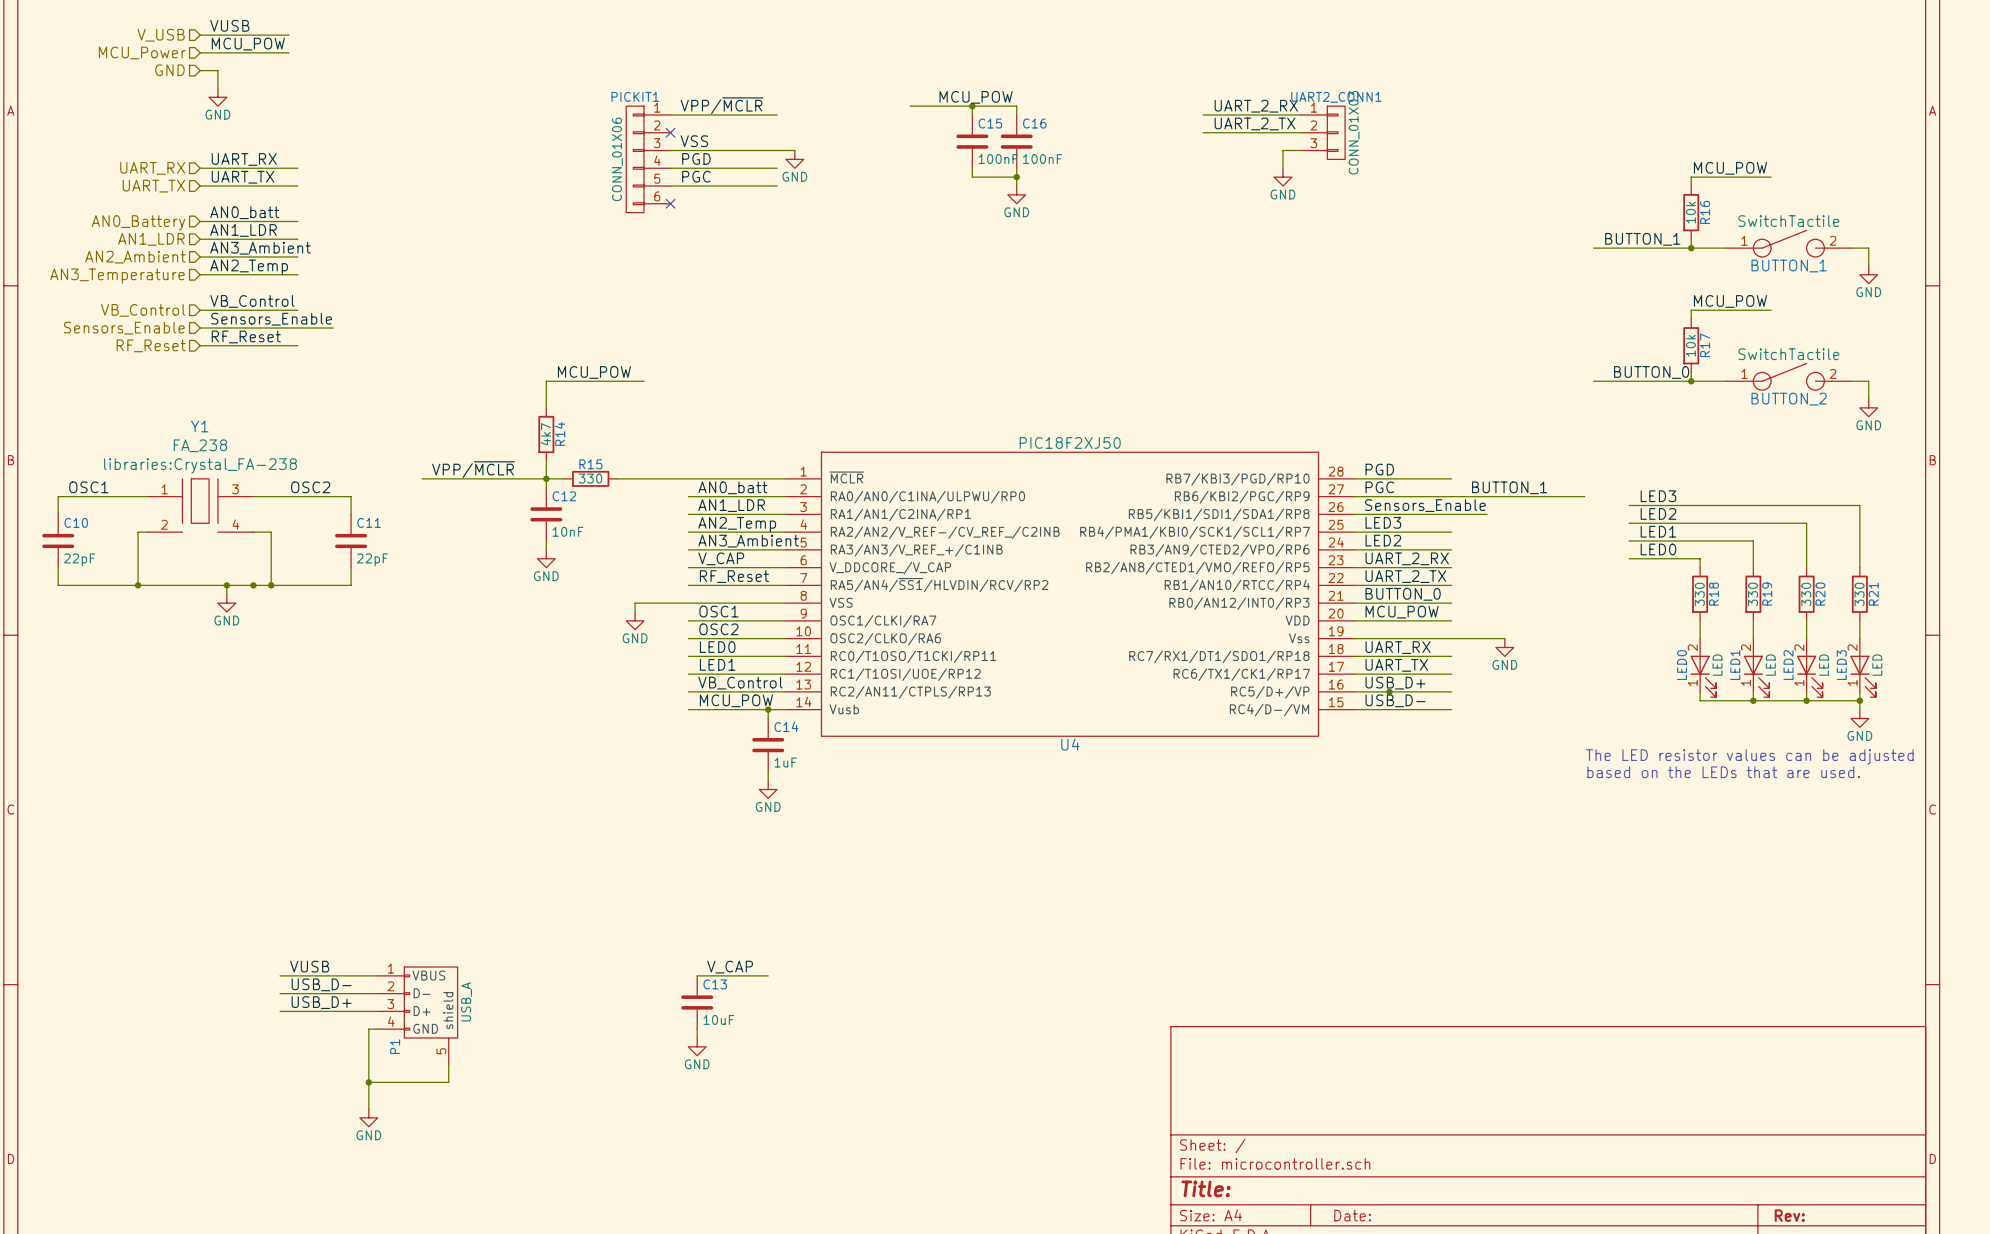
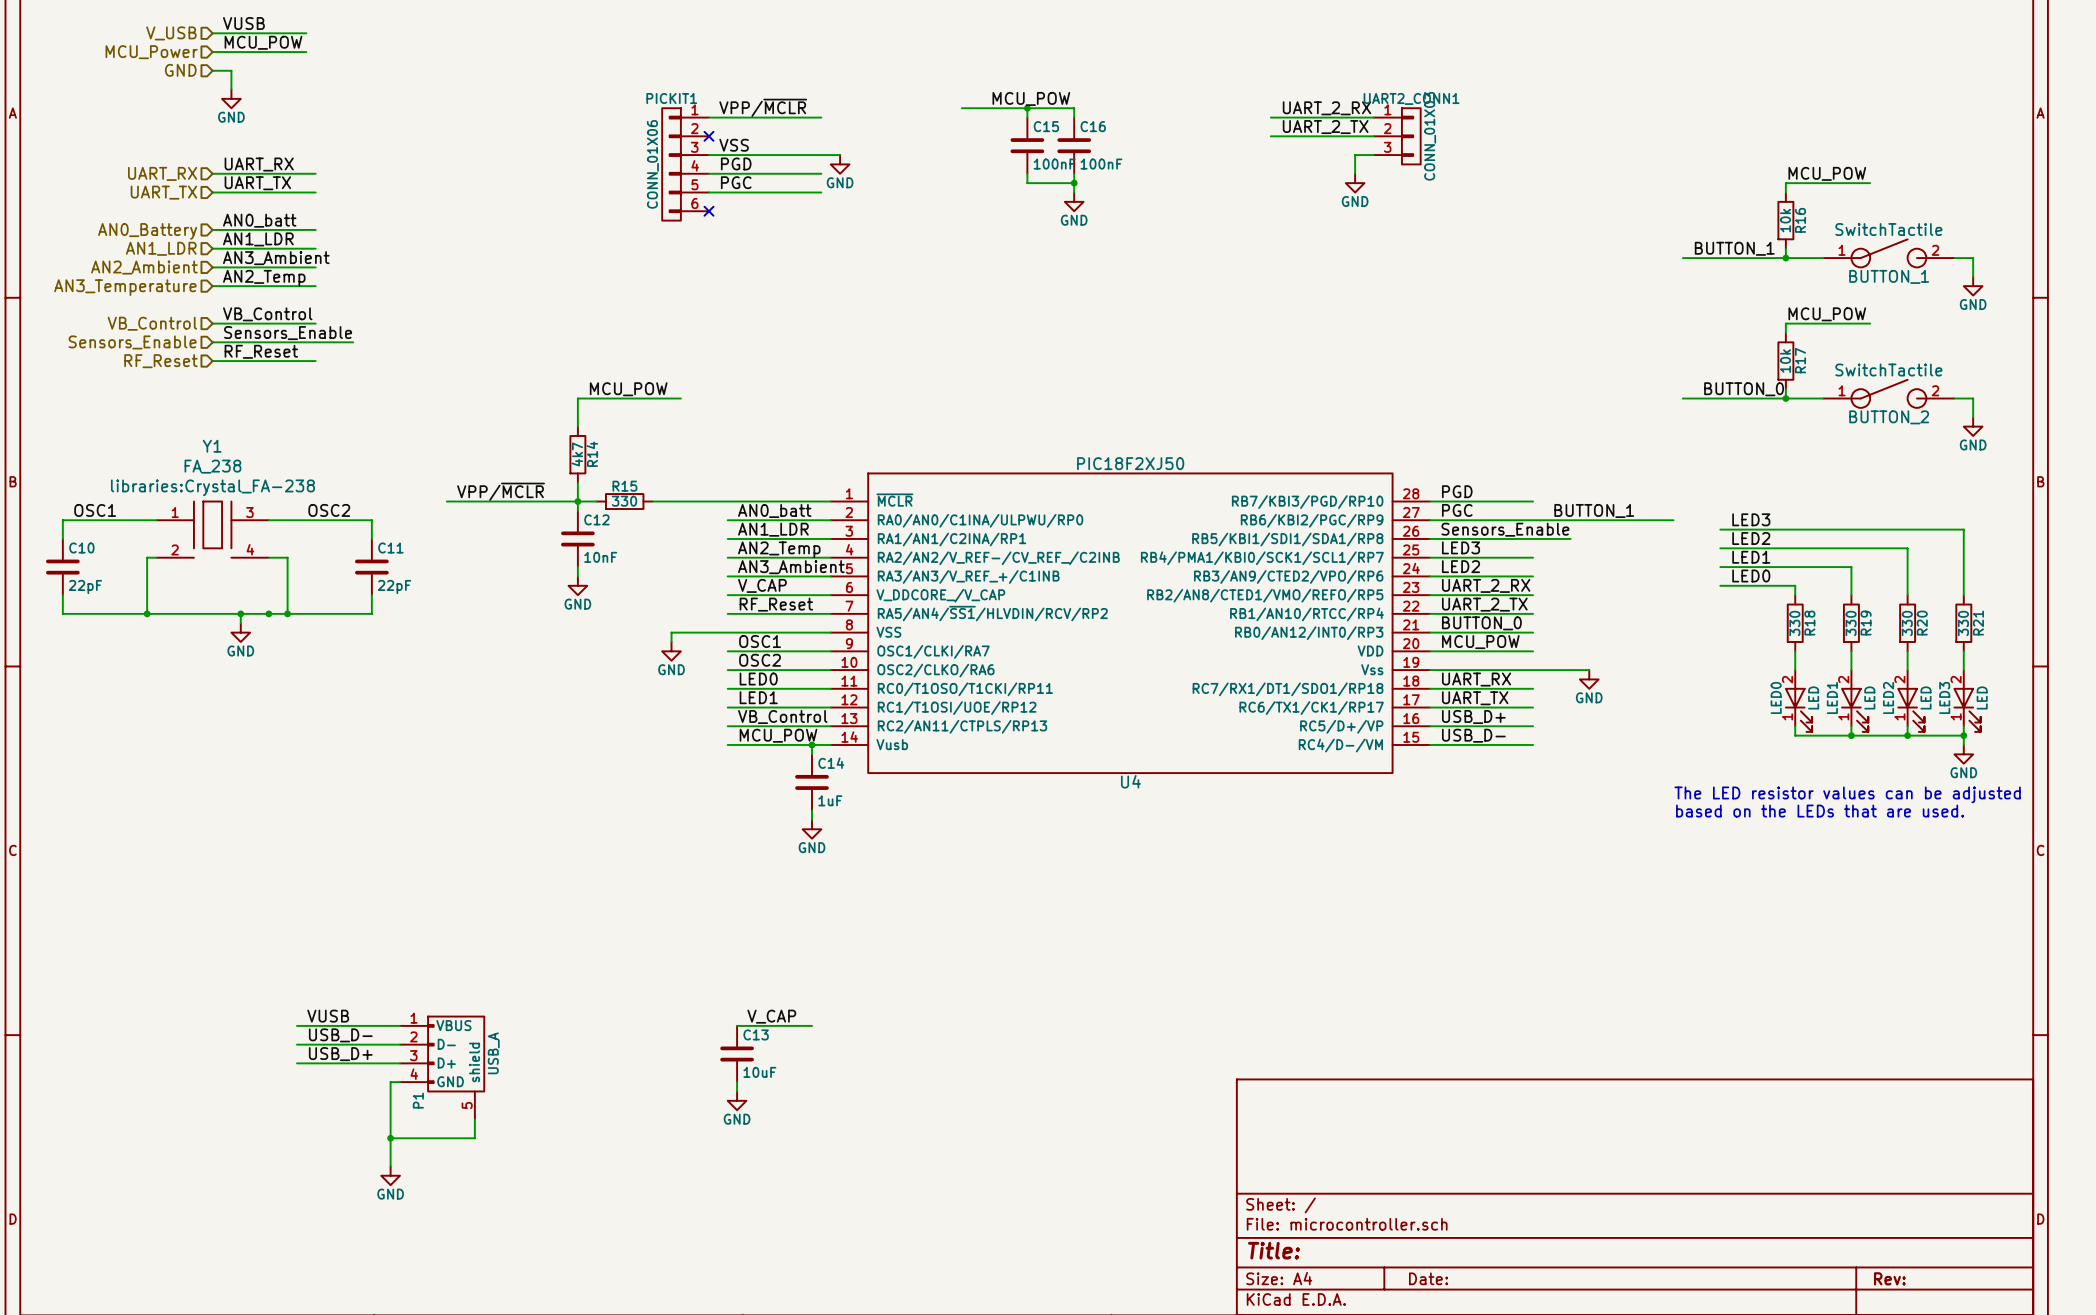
junction: (1389, 691) -> none

